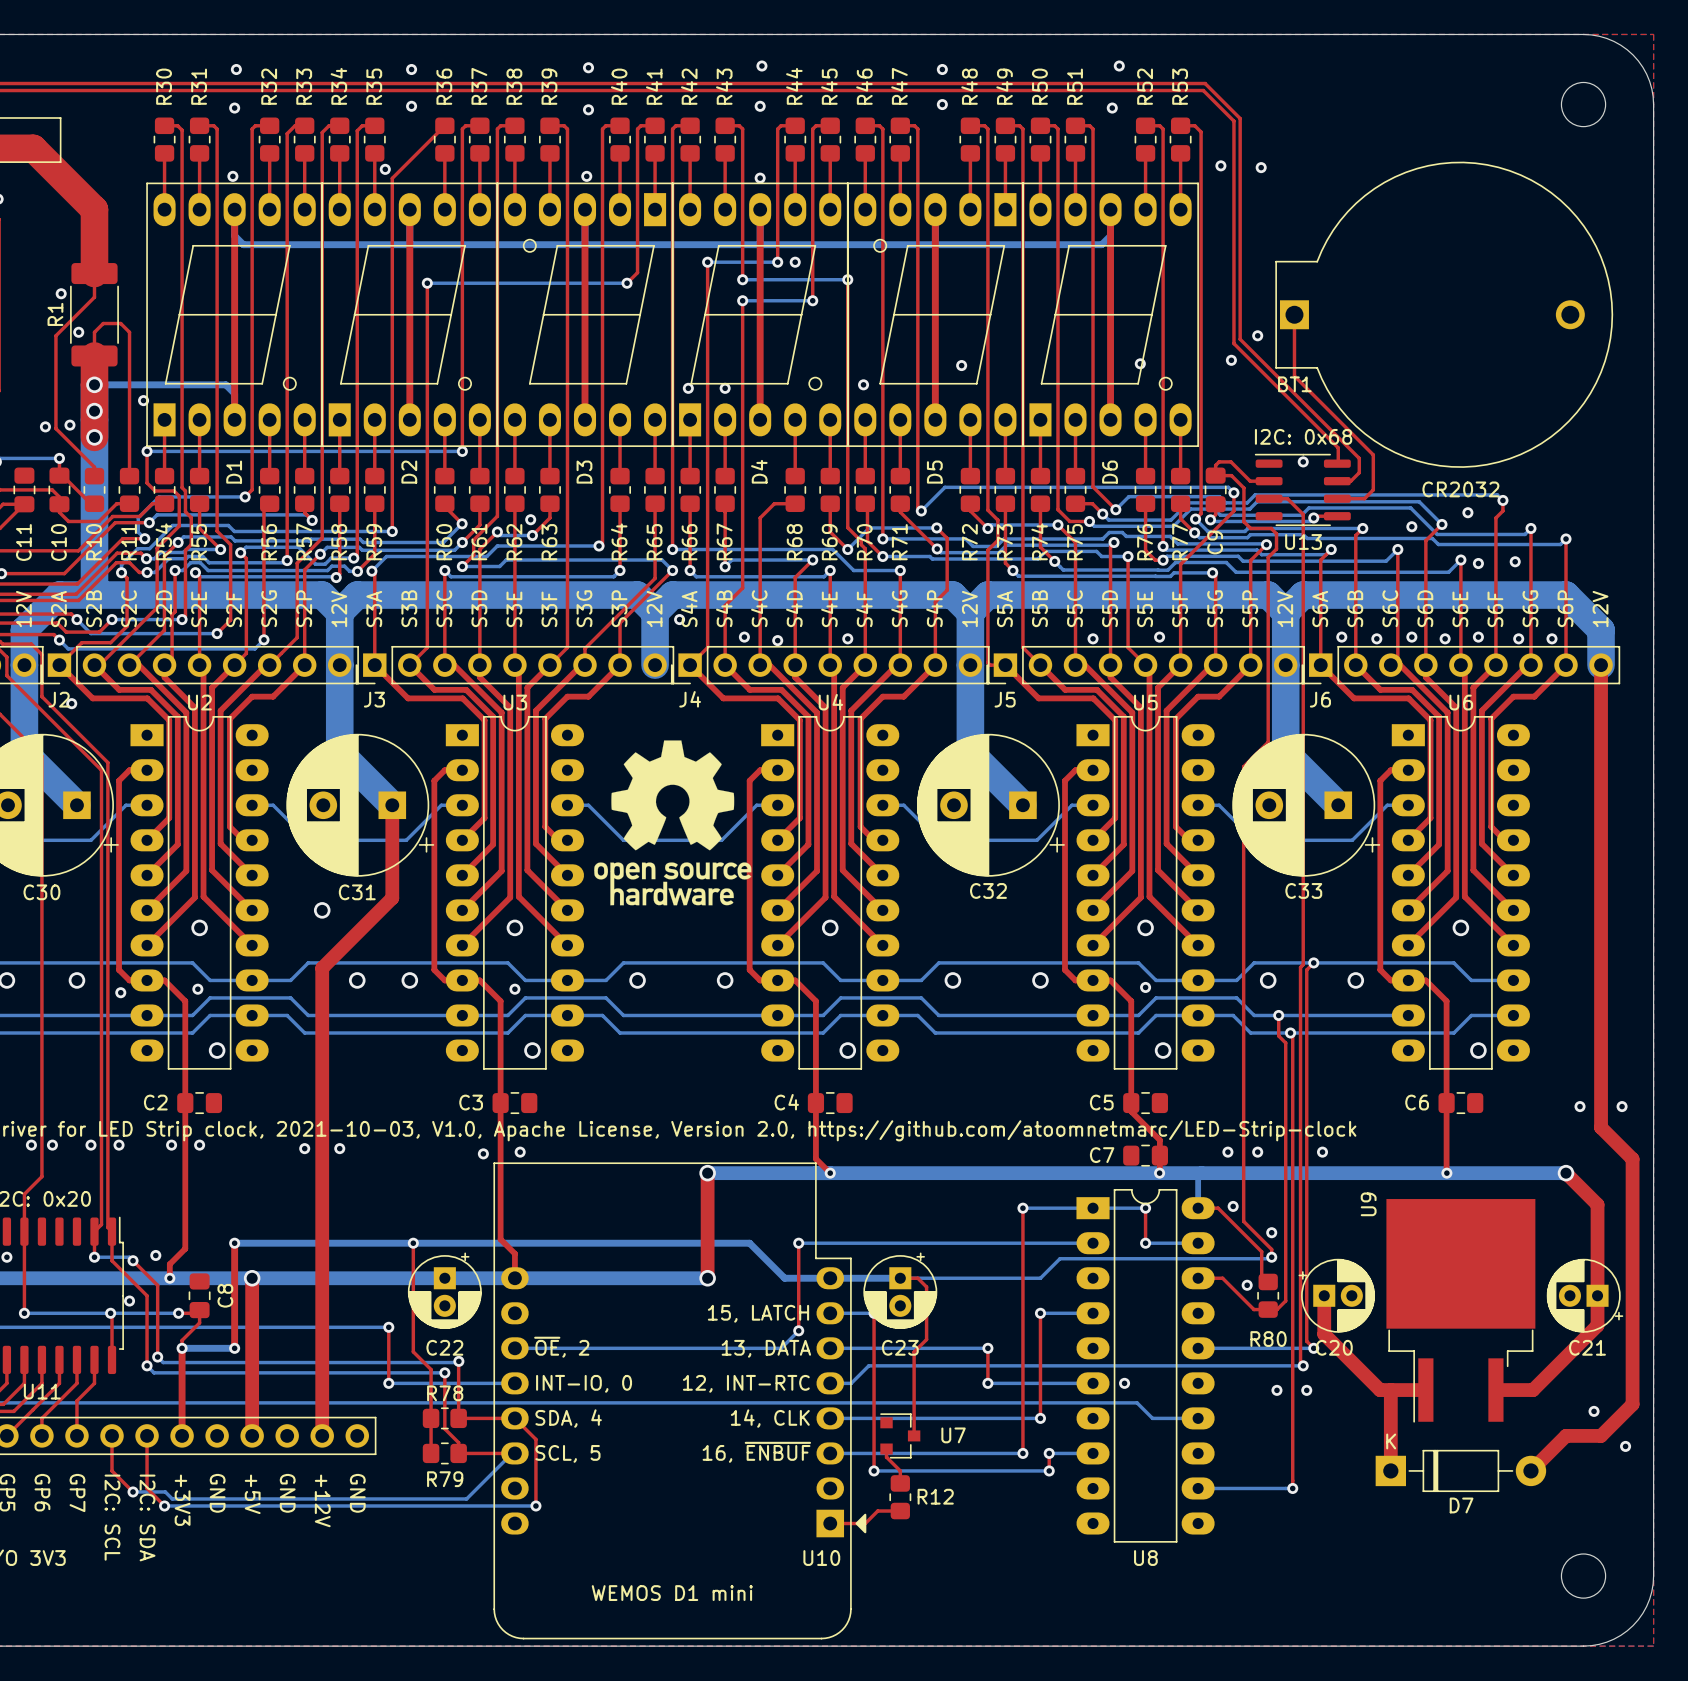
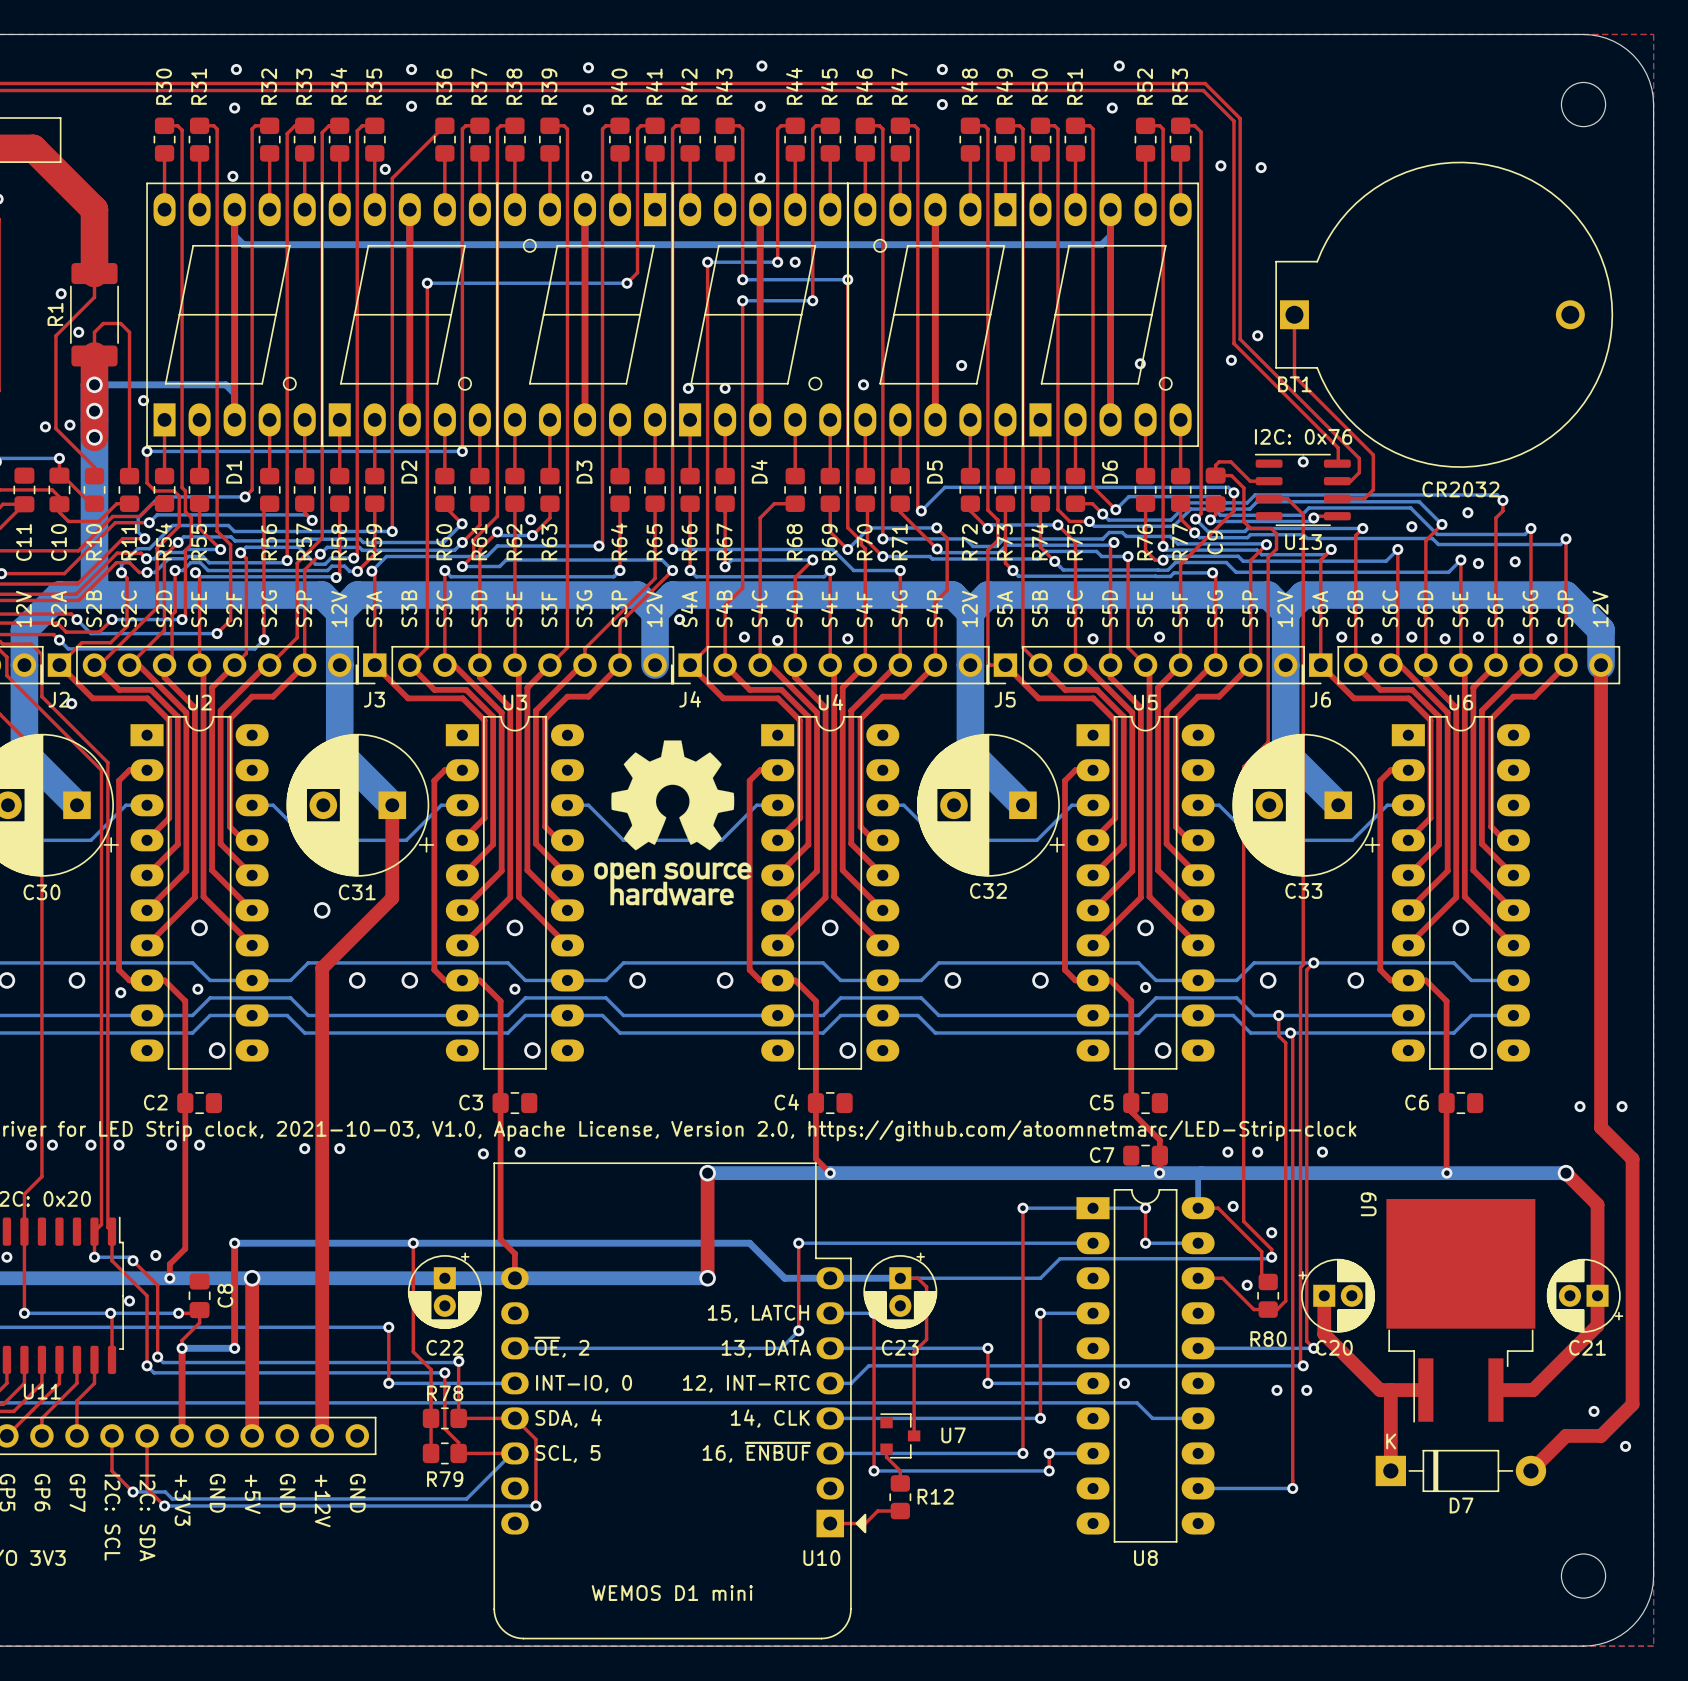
text: I2C: 0x68 (1303, 436) -> I2C: 0x76 (1303, 436)

